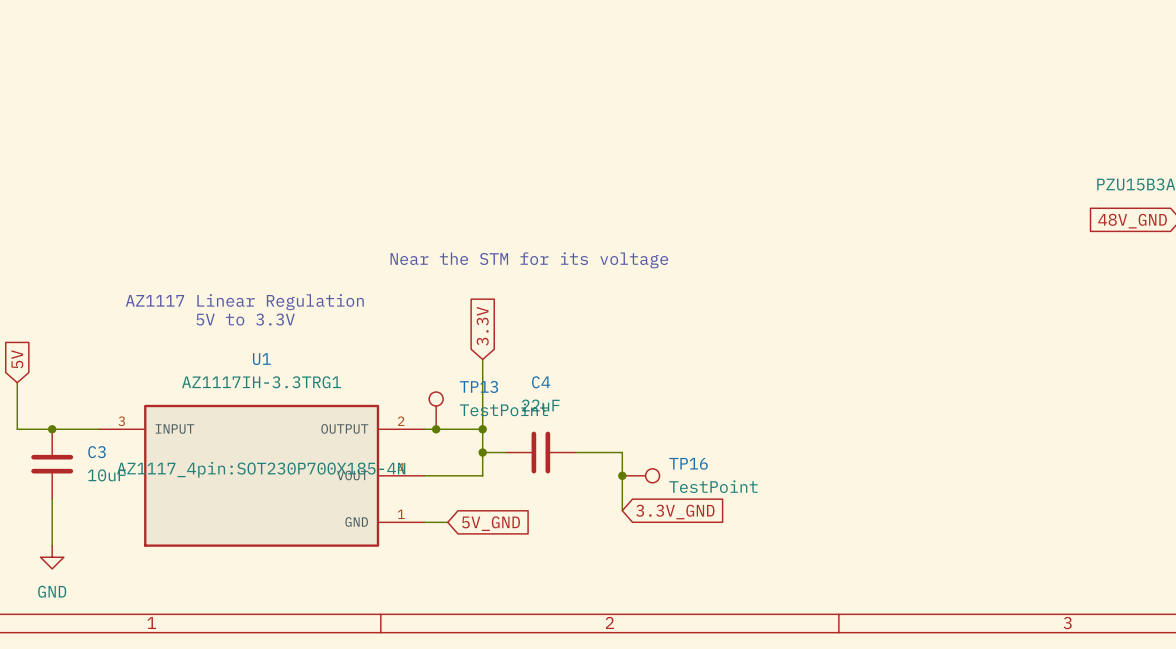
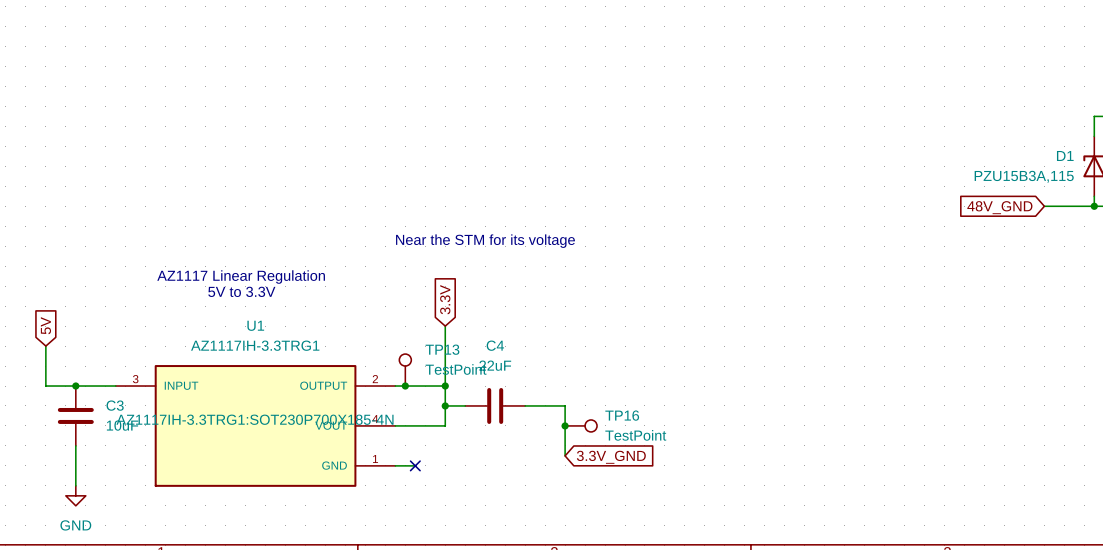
U1 text: AZ1117_4pin:SOT230P700X185-4N (261, 469) -> AZ1117IH-3.3TRG1:SOT230P700X185-4N (254, 419)
no-connect mark: none -> (415, 465)
global label: 5V_GND (491, 523) -> none

